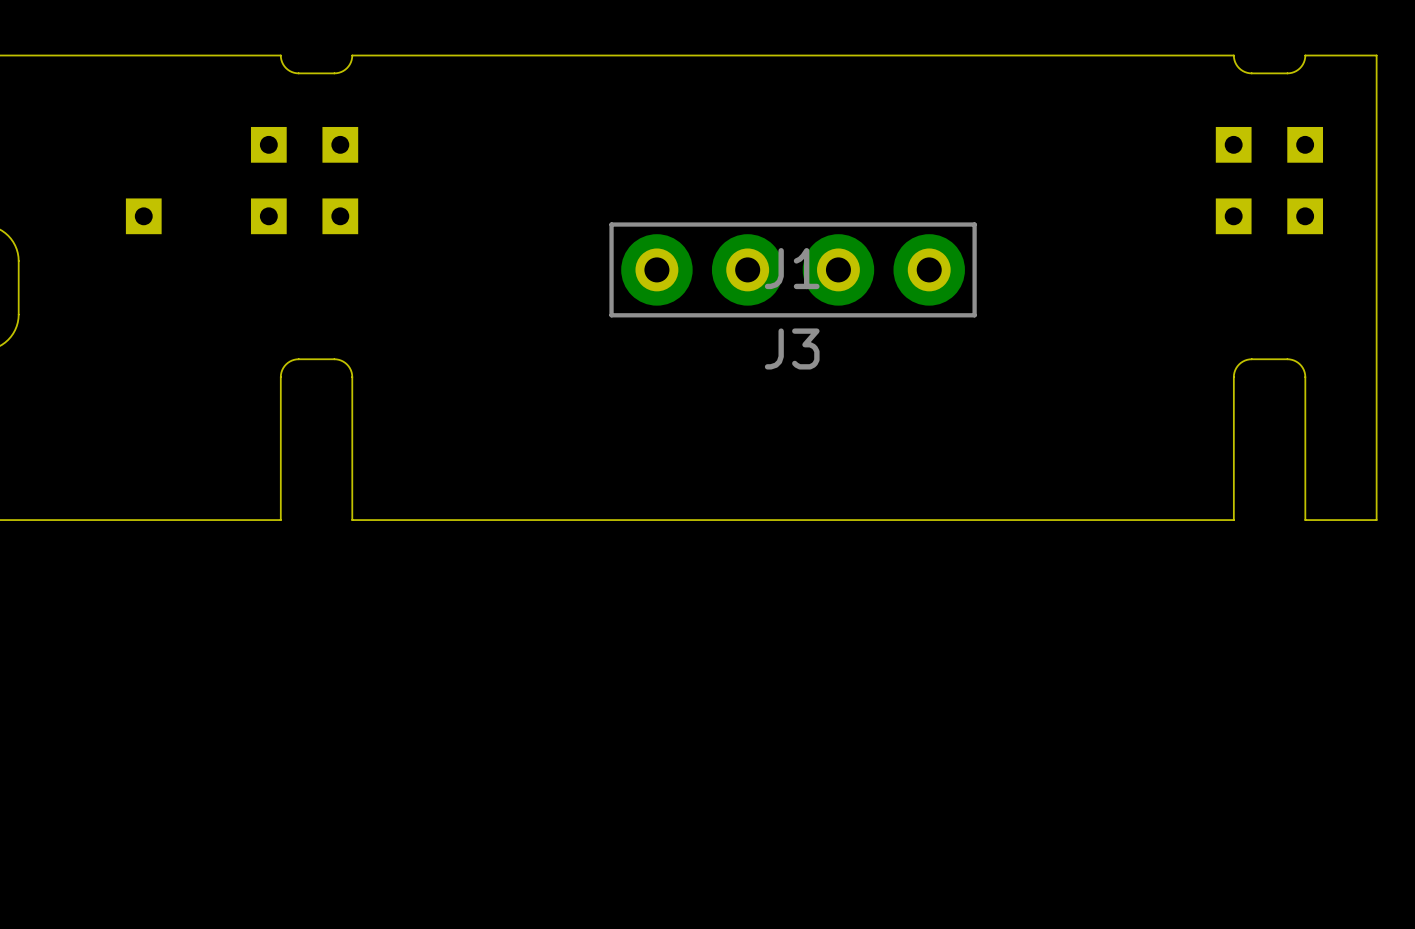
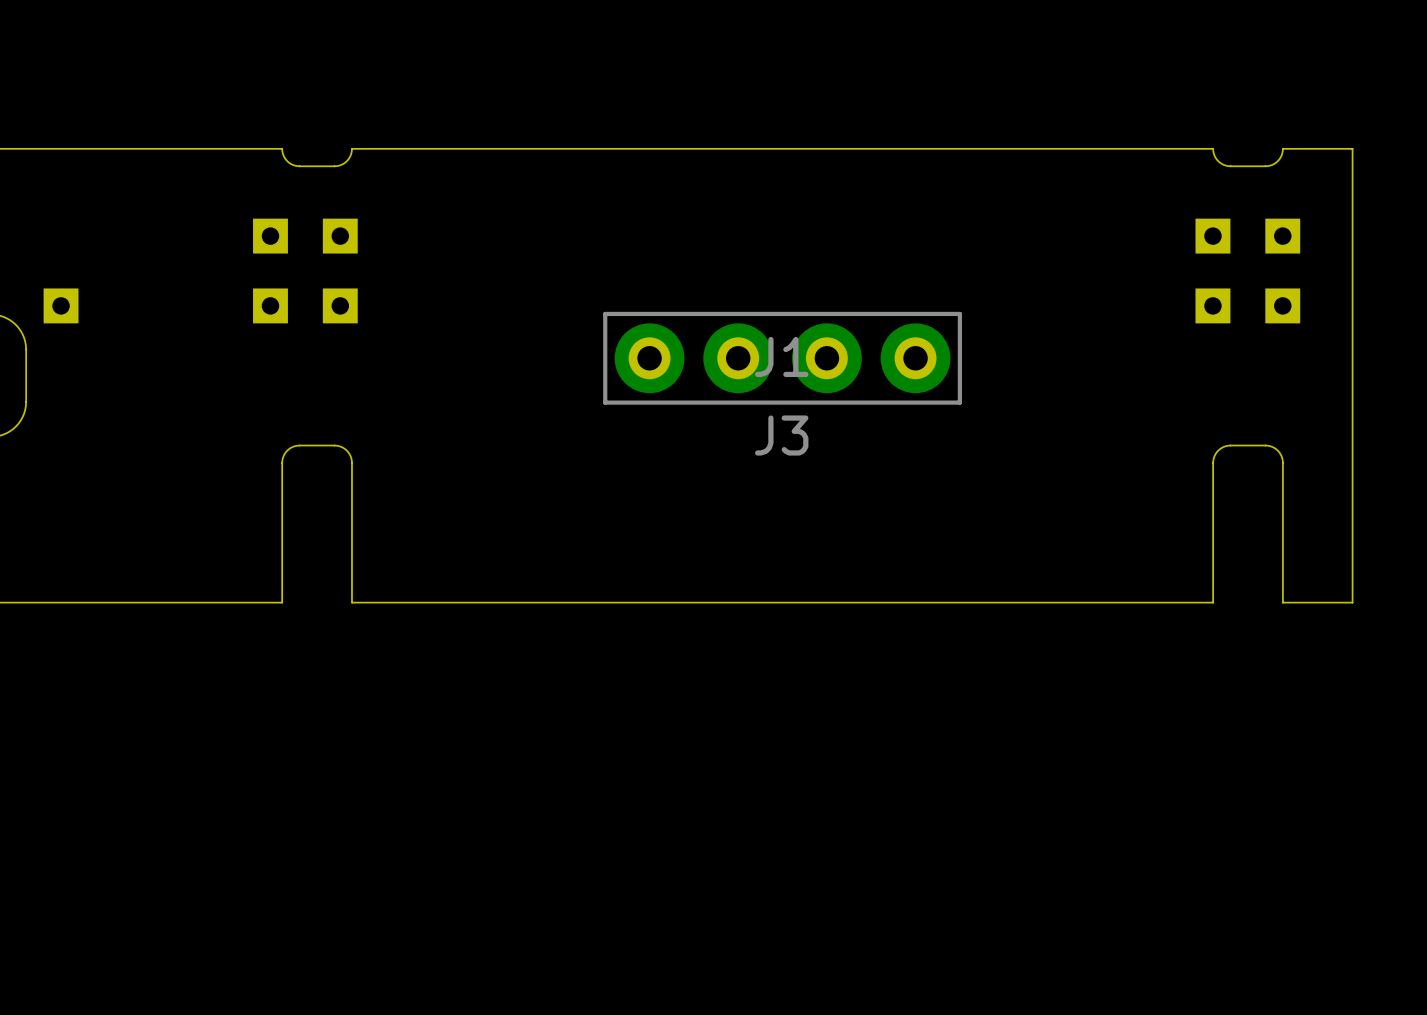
part position: (143, 216) -> (61, 305)

